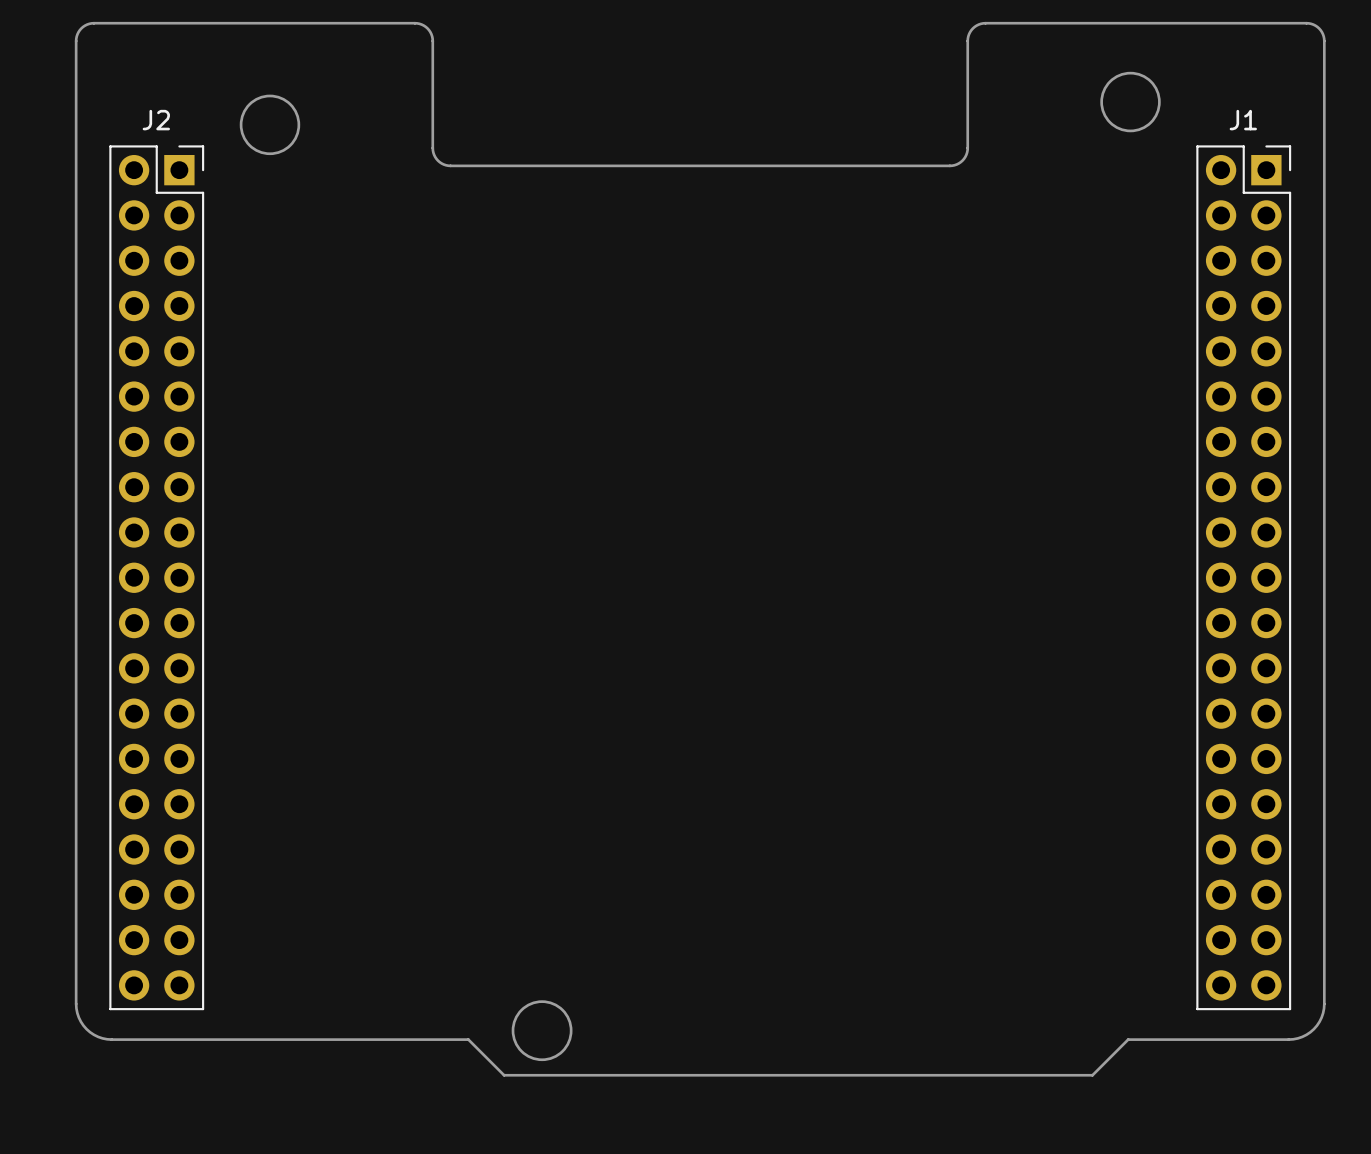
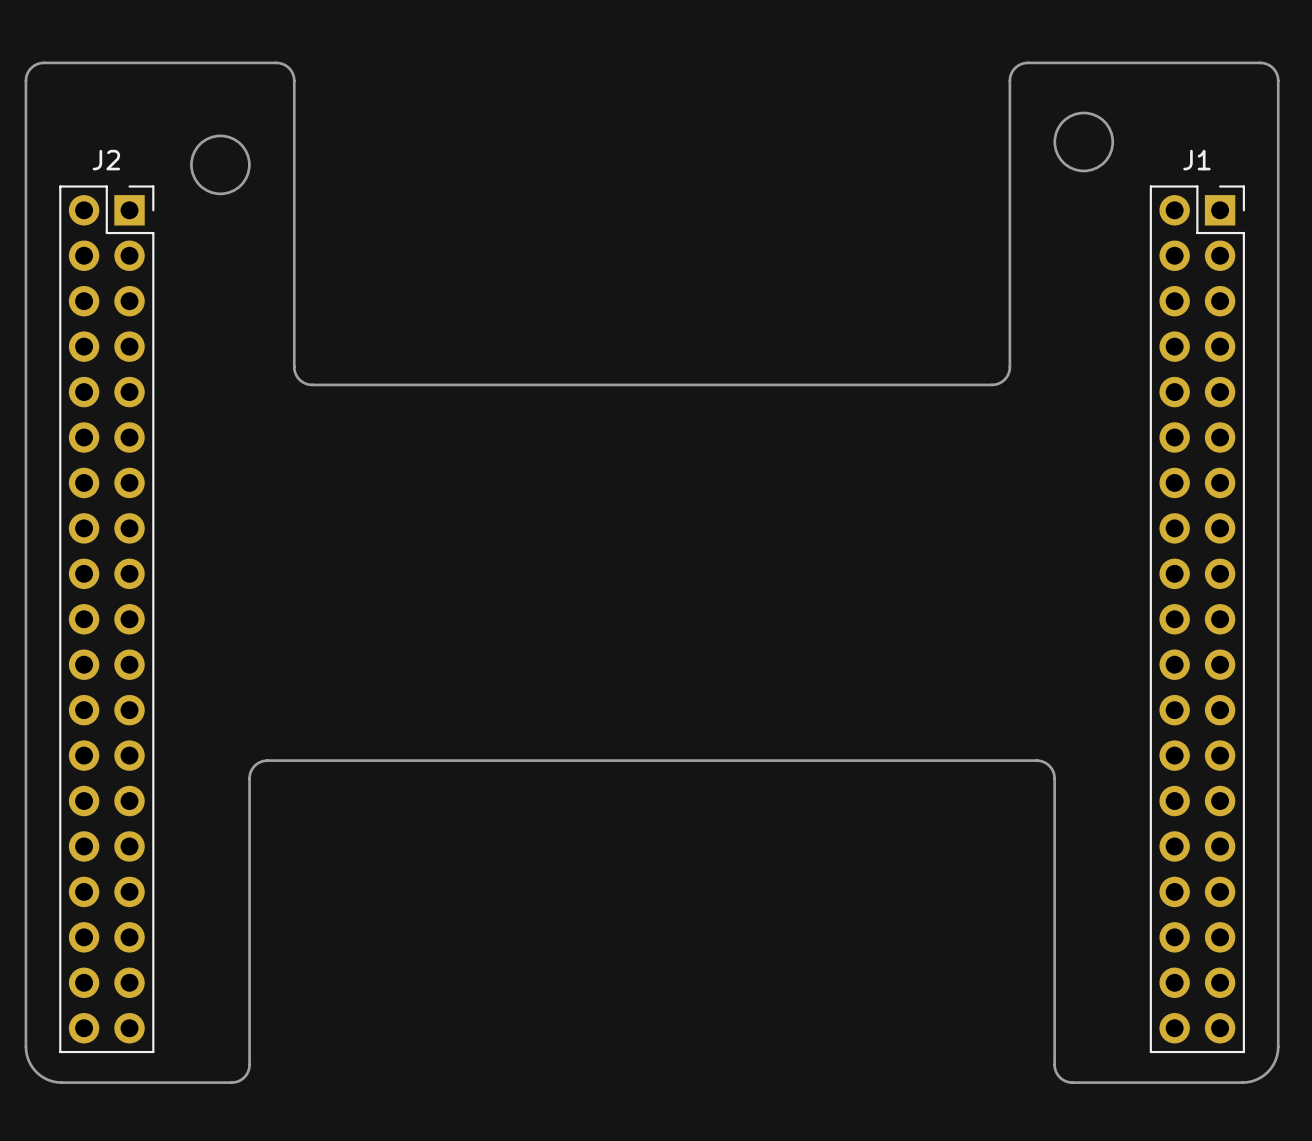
board edge: (1074, 23) (983, 23) (971, 30) (967, 41) (967, 150) (962, 160) (949, 165) (445, 165) (437, 160) (432, 150) (432, 41) (429, 30) (417, 23) (325, 23) -> (1027, 62) (1015, 68) (1010, 78) (1009, 367) (1004, 379) (992, 384) (305, 383) (297, 377) (294, 367) (294, 78) (289, 68) (276, 62)
round board edge: [511, 1000, 573, 1062] -> none
board edge: (1128, 1039) (1092, 1075) (504, 1075) (468, 1039) (281, 1039) -> (1081, 1082) (1063, 1080) (1057, 1073) (1054, 1067) (1054, 778) (1049, 765) (1036, 760) (260, 761) (253, 767) (249, 778) (249, 1067) (242, 1078) (231, 1082)

